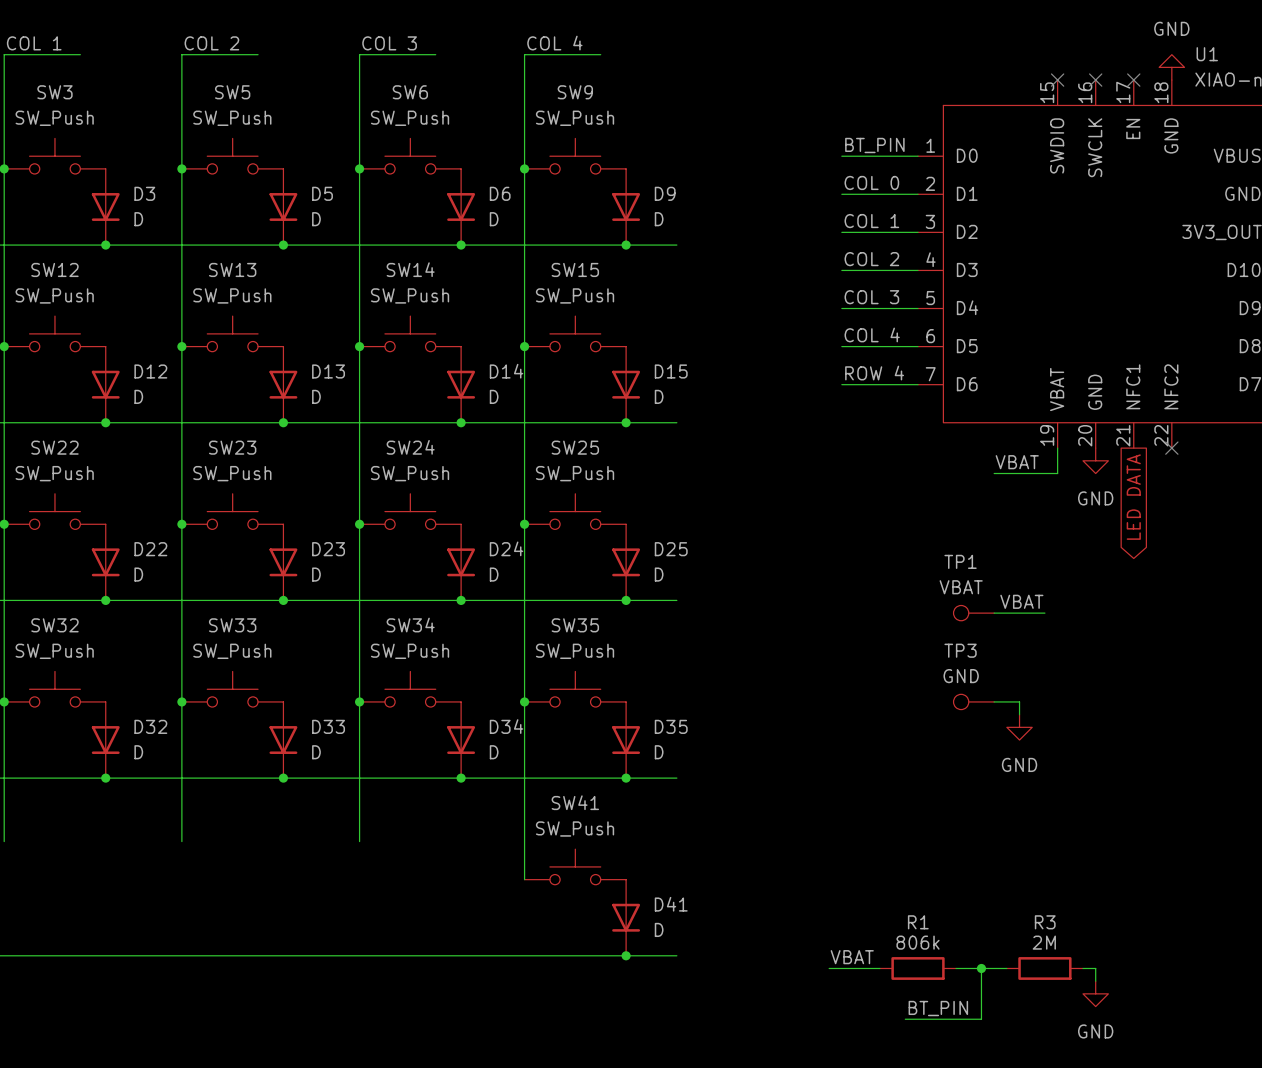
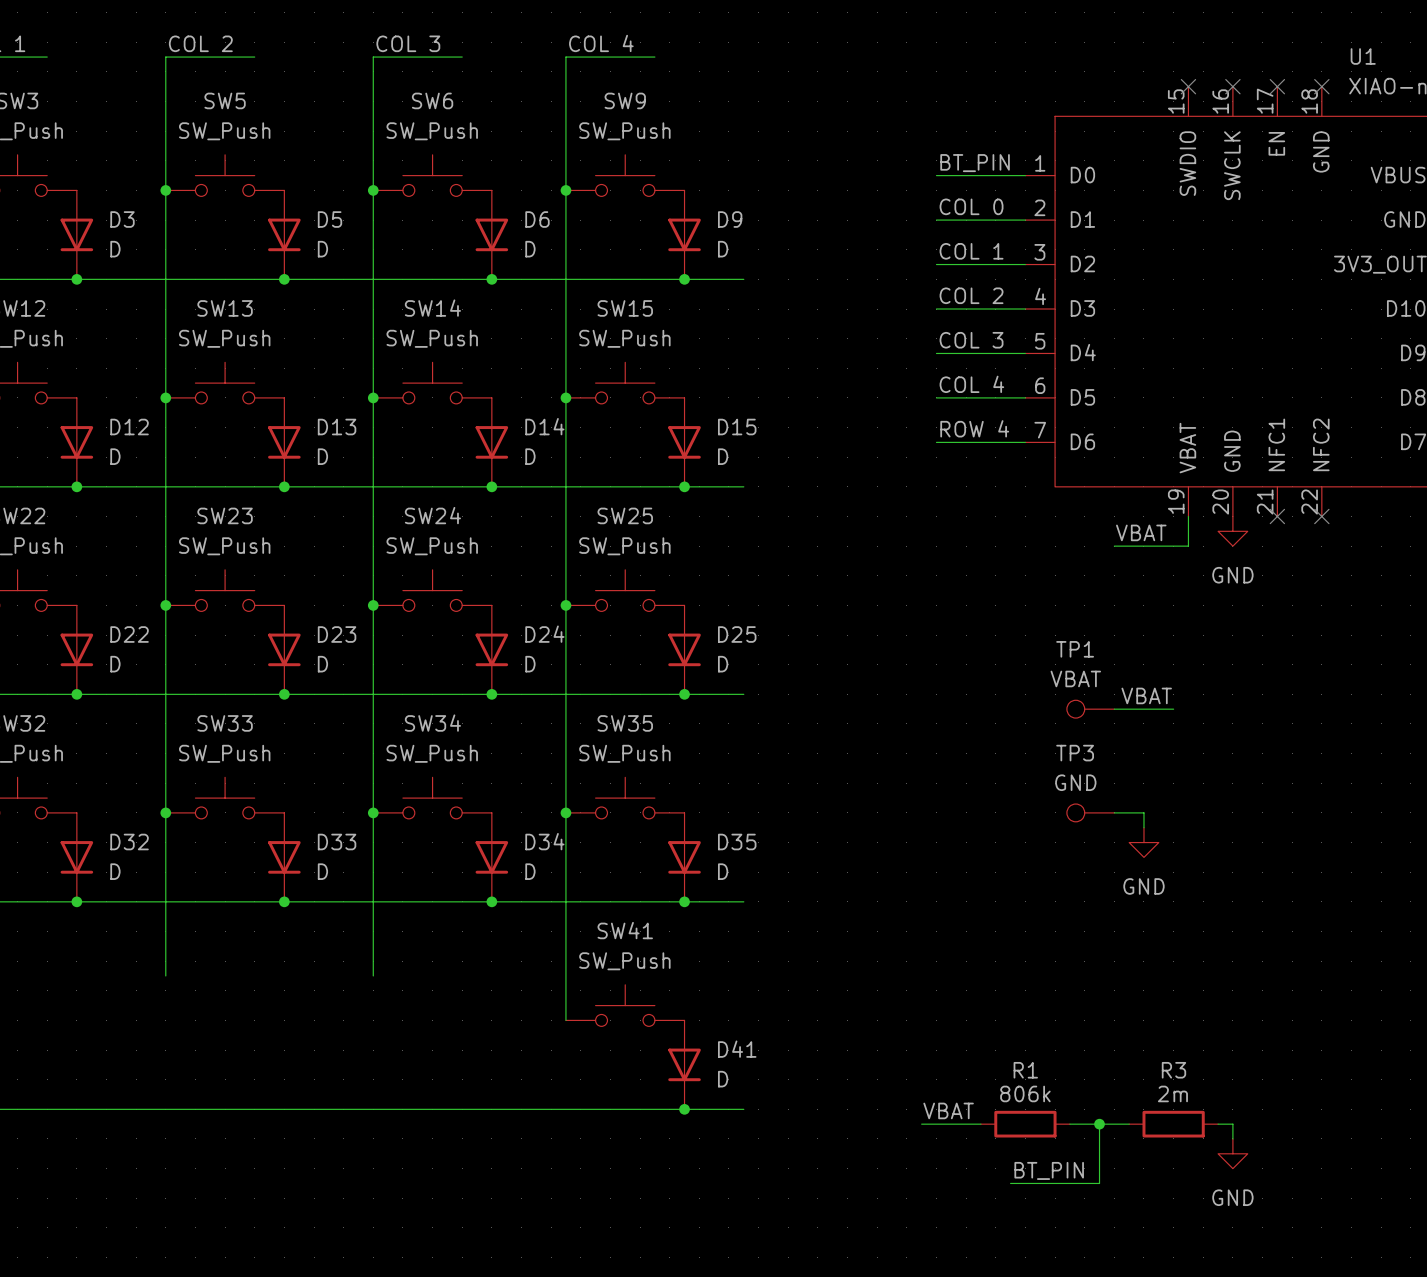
power symbol: GND (1171, 67) -> none
no-connect mark: none -> (1321, 86)
no-connect mark: none -> (1277, 516)
global label: LED DATA (1133, 497) -> none
R3 value: 2M (1044, 942) -> 2m (1172, 1093)

